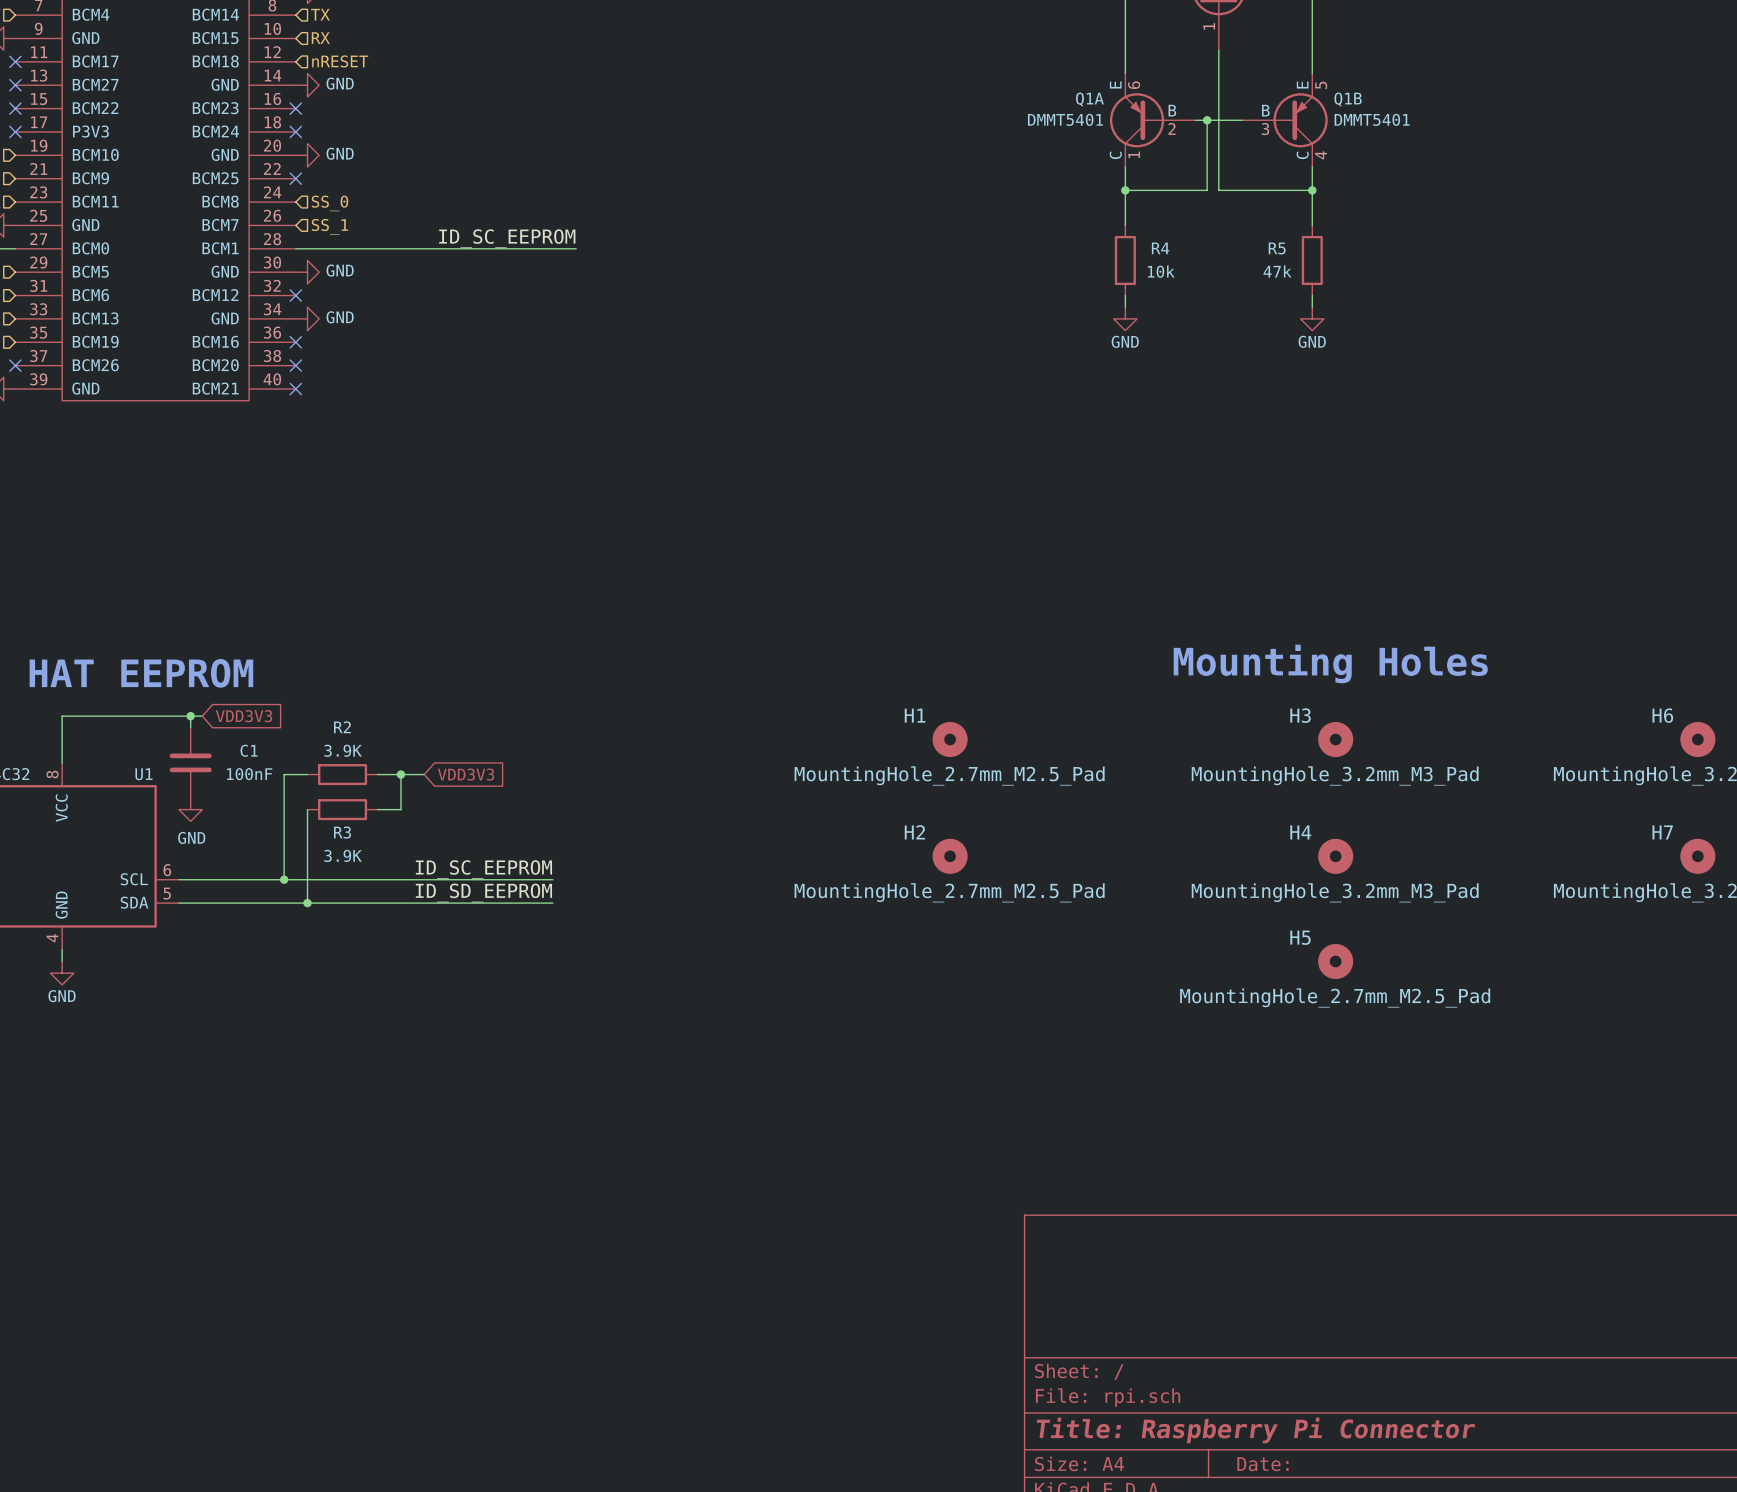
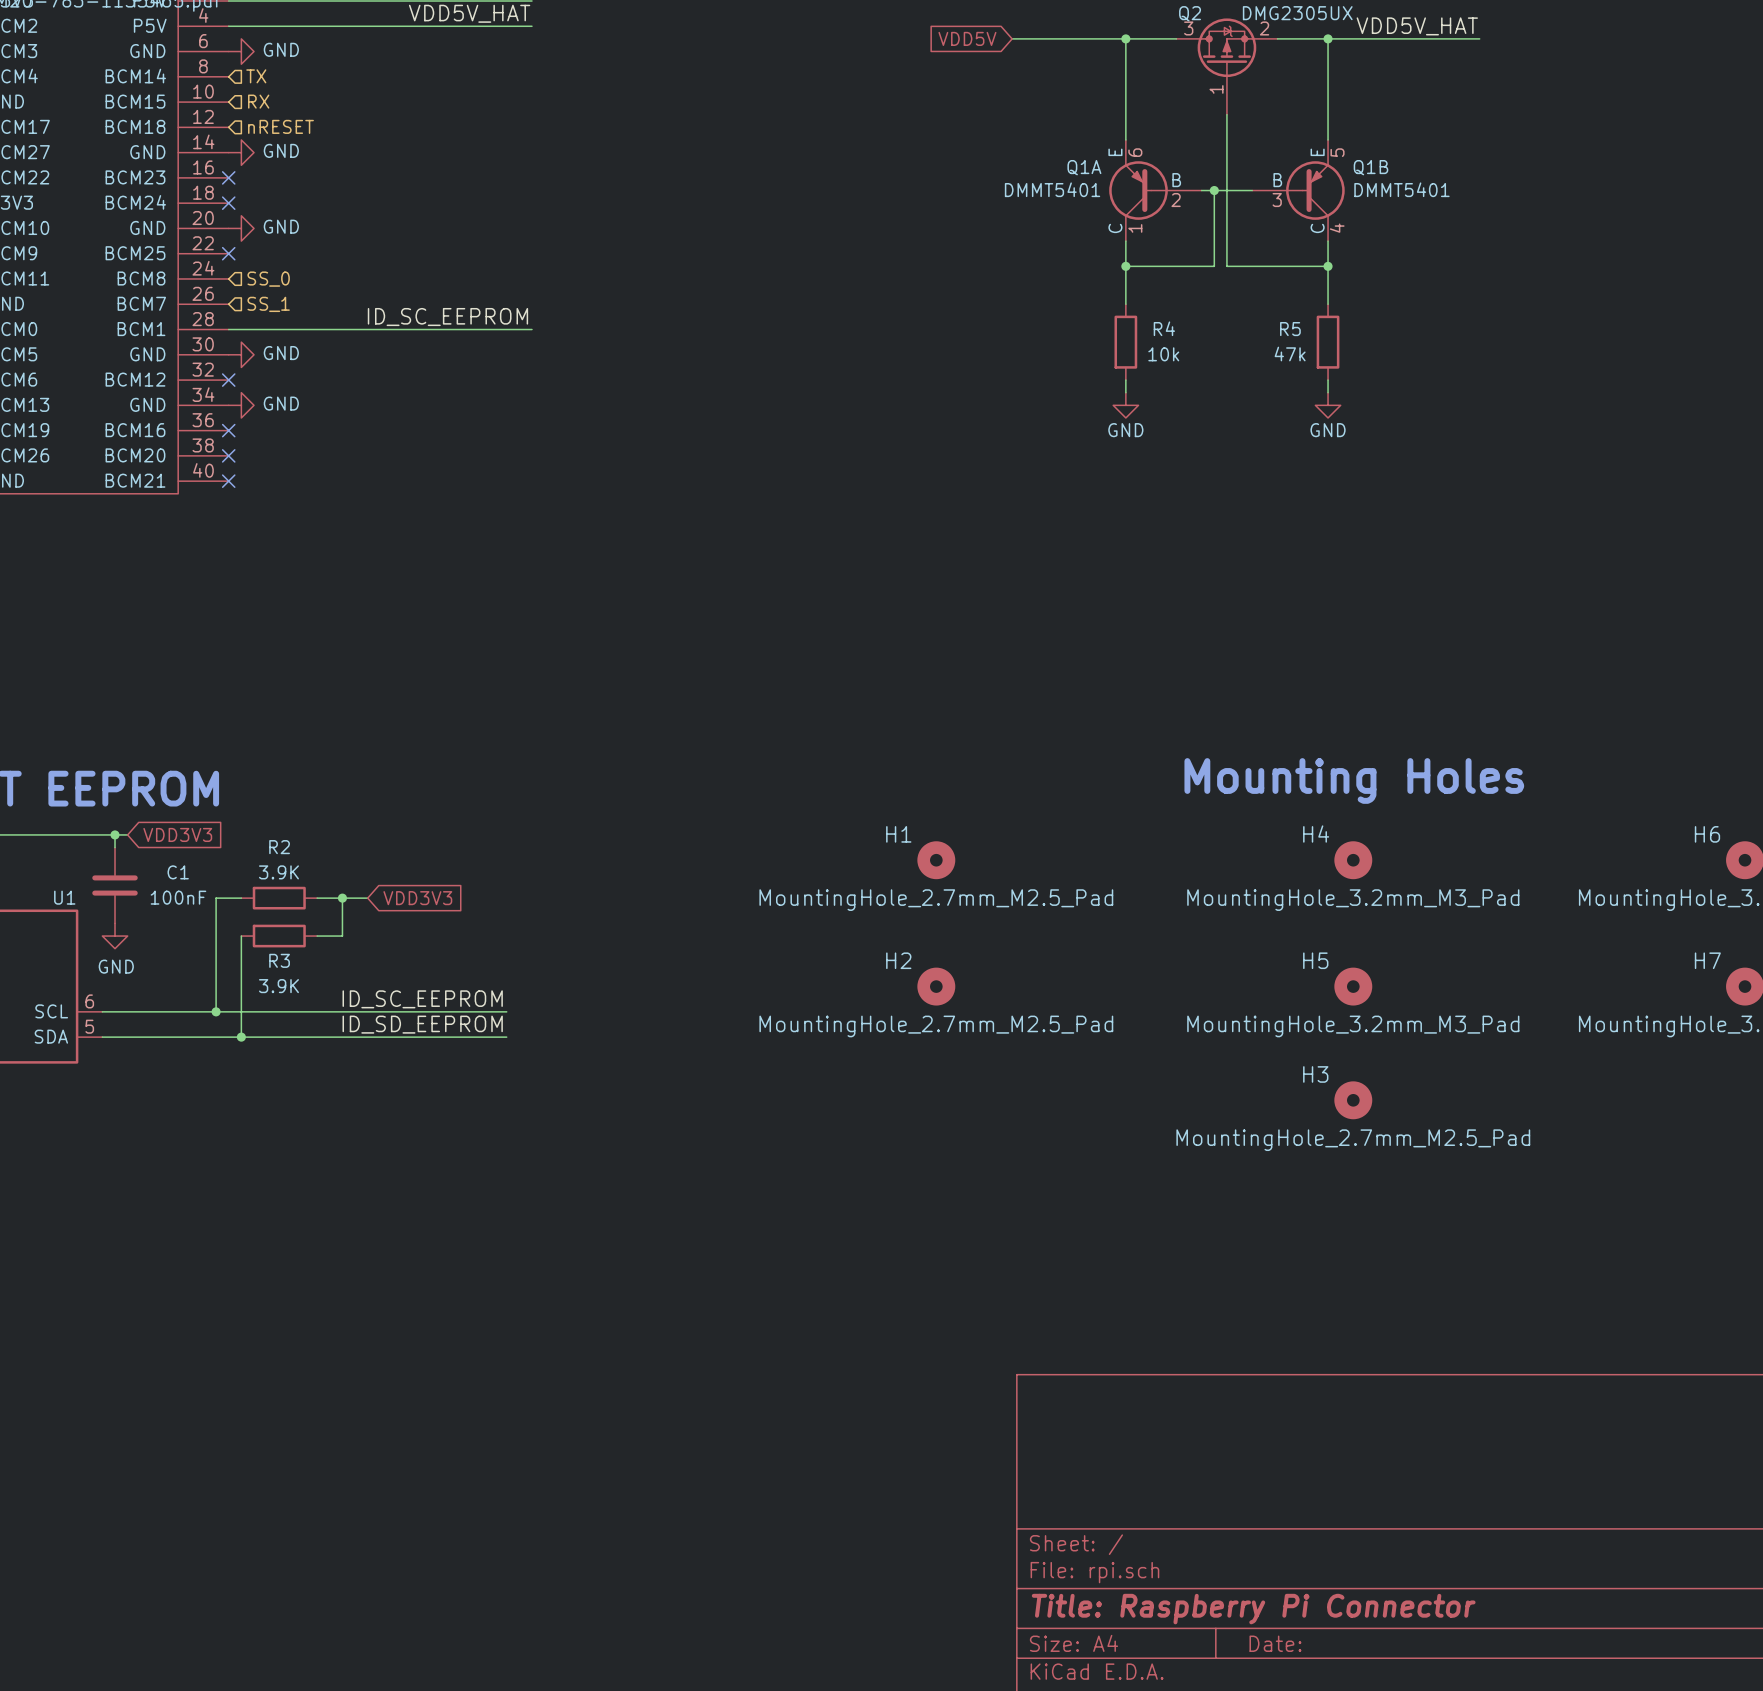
H3 name: H3 (1300, 715) -> H4 (1316, 834)
H4 name: H4 (1300, 832) -> H5 (1315, 960)
H5 name: H5 (1300, 937) -> H3 (1315, 1074)

